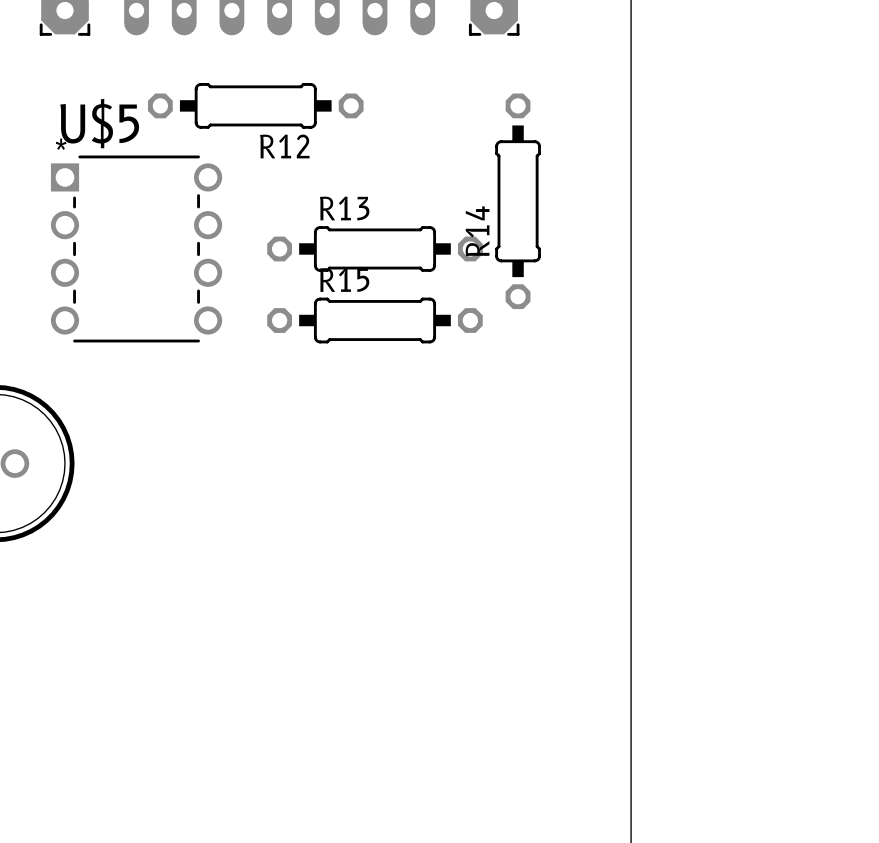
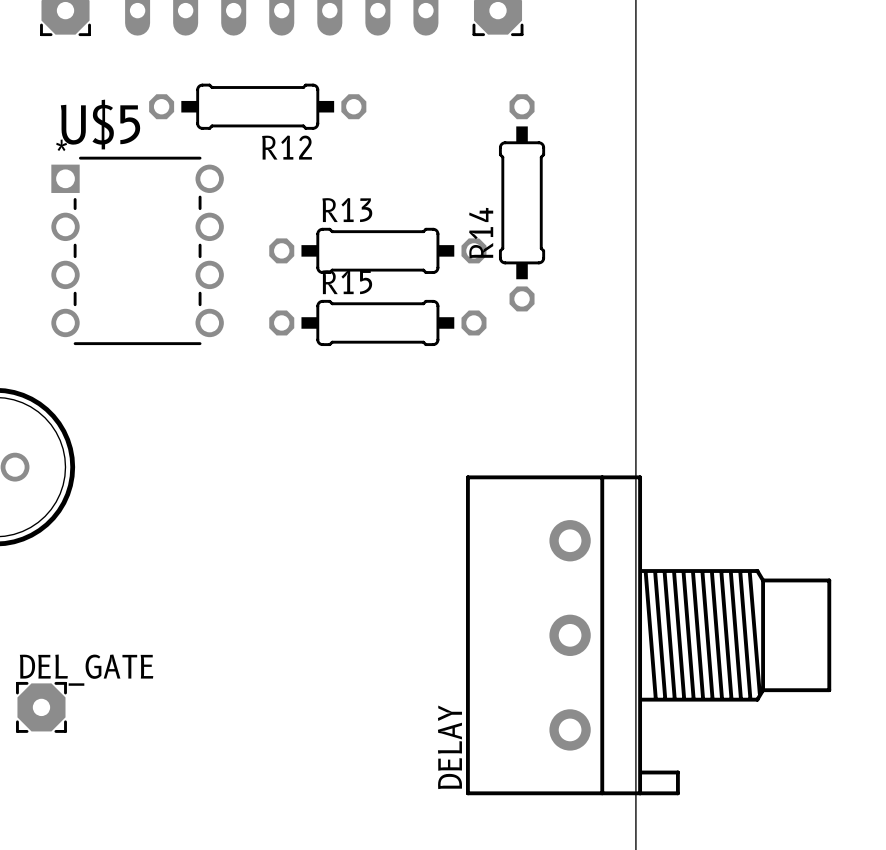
DELAY: none -> (648, 635)
DEL_GATE: none -> (41, 707)

